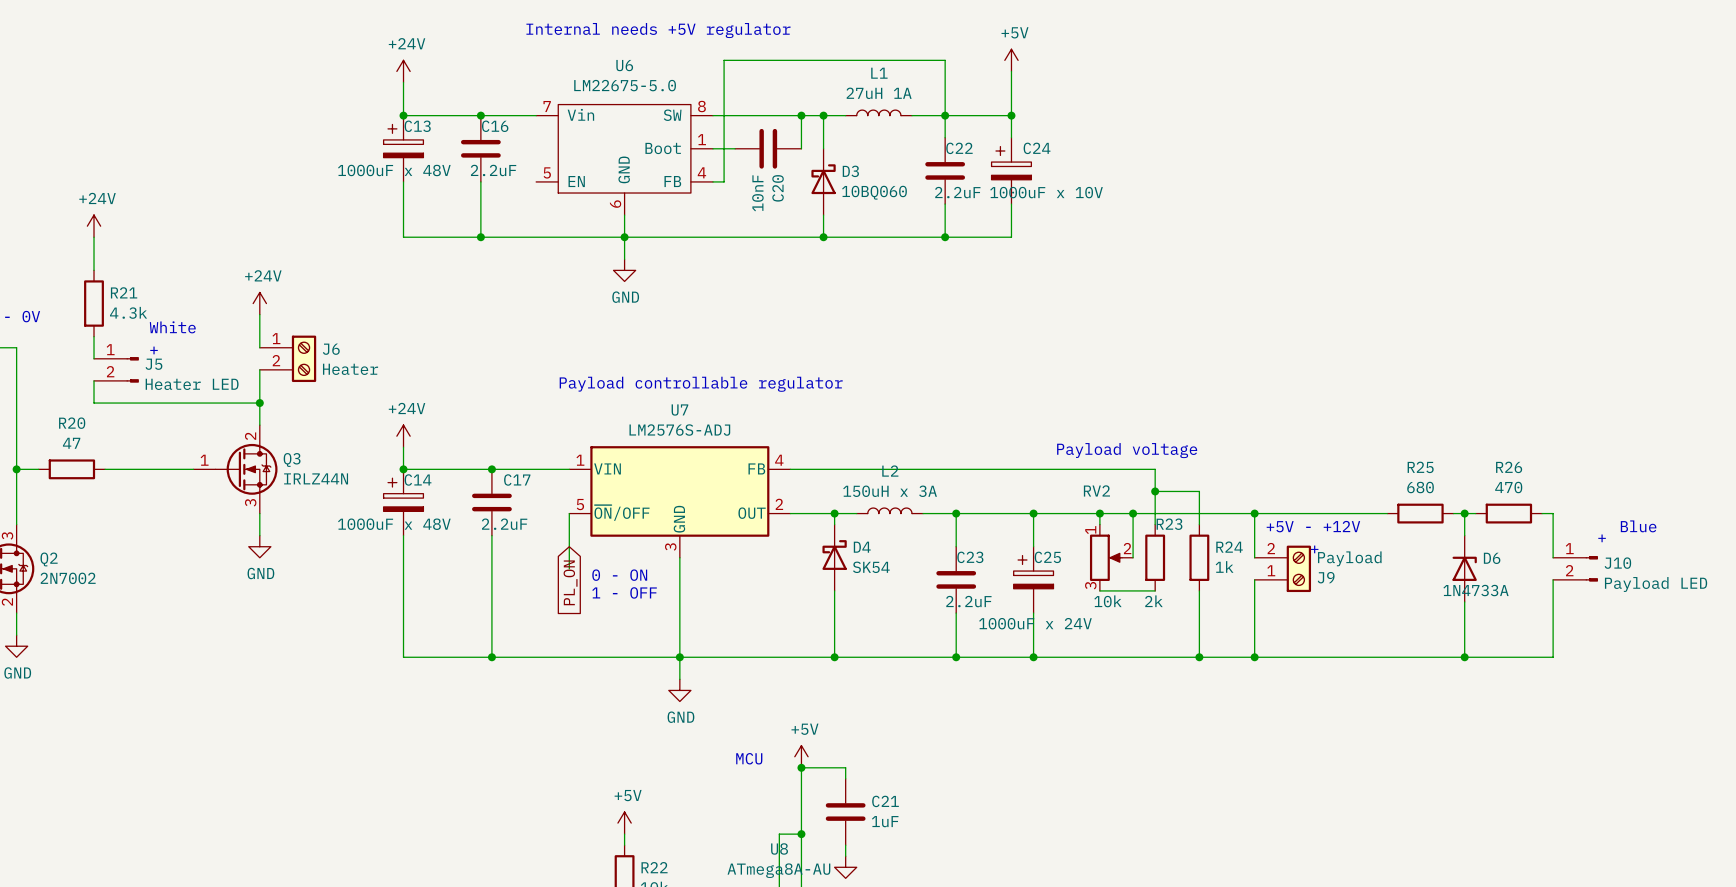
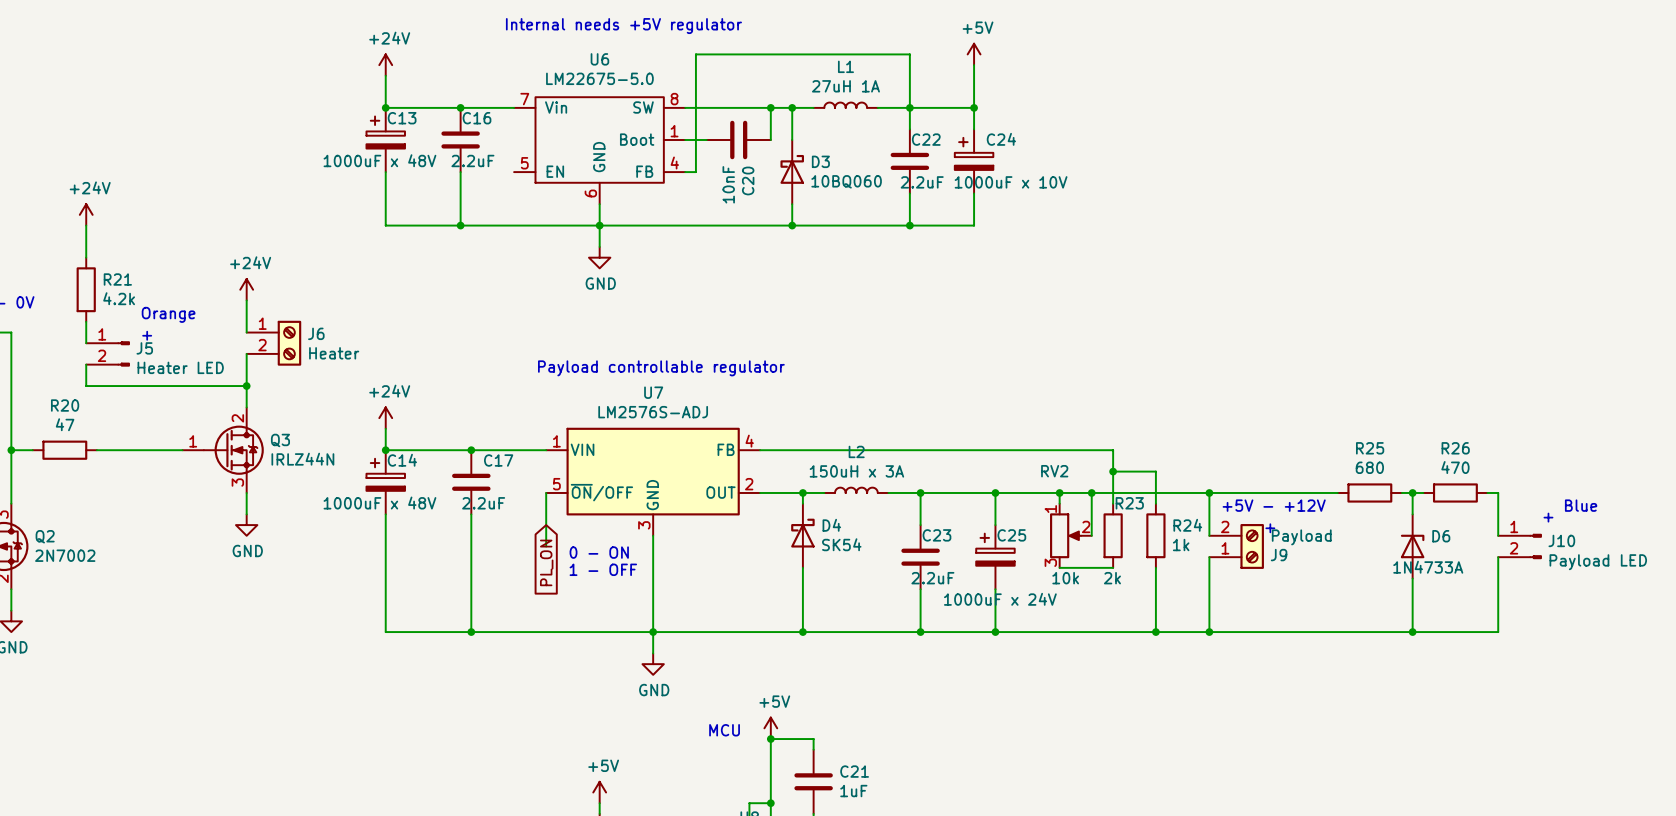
R21 value: 4.3k (128, 312) -> 4.2k (119, 298)
text: White (172, 327) -> Orange (168, 314)
text: Payload voltage (1127, 450) -> none

